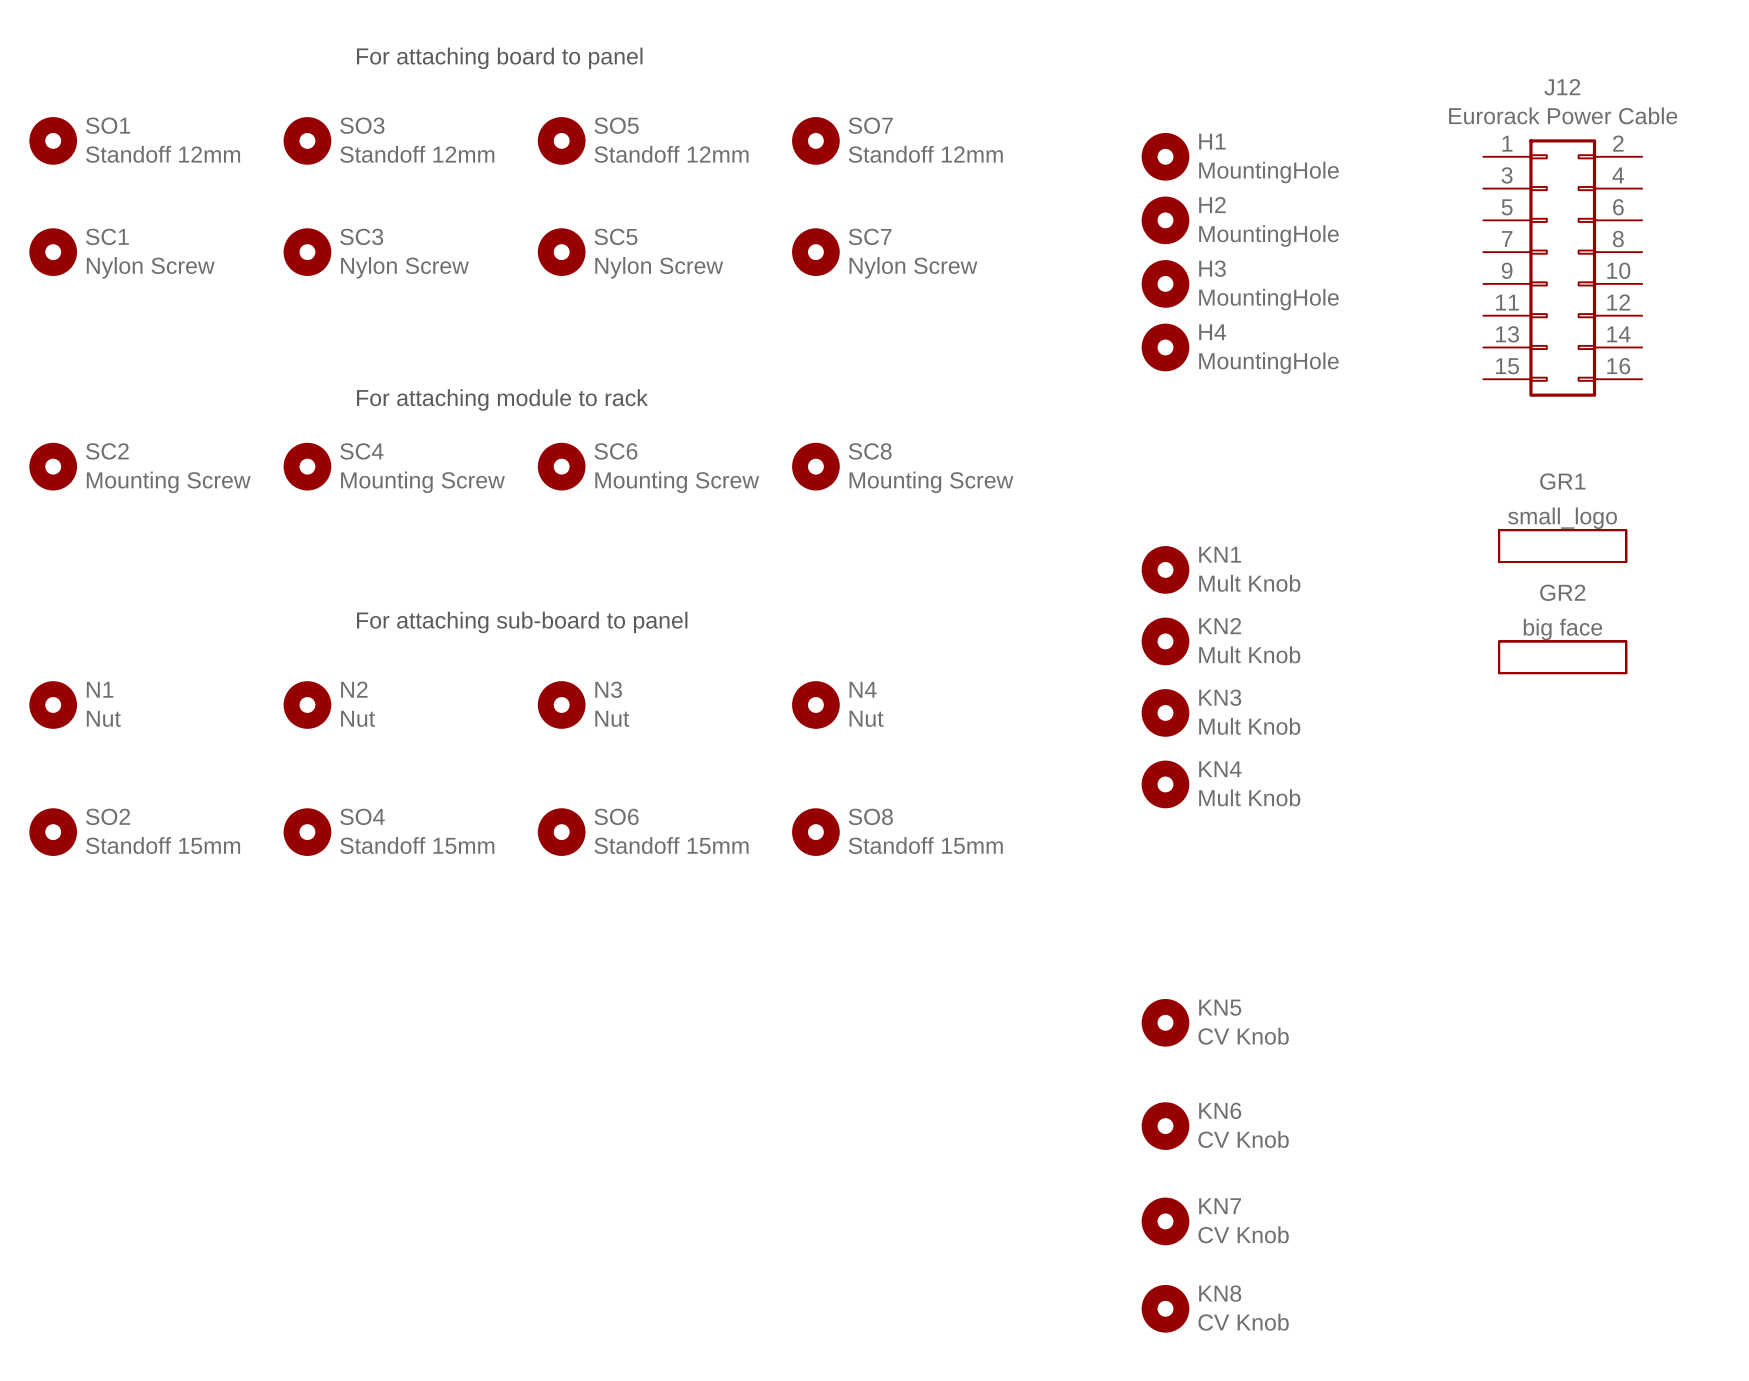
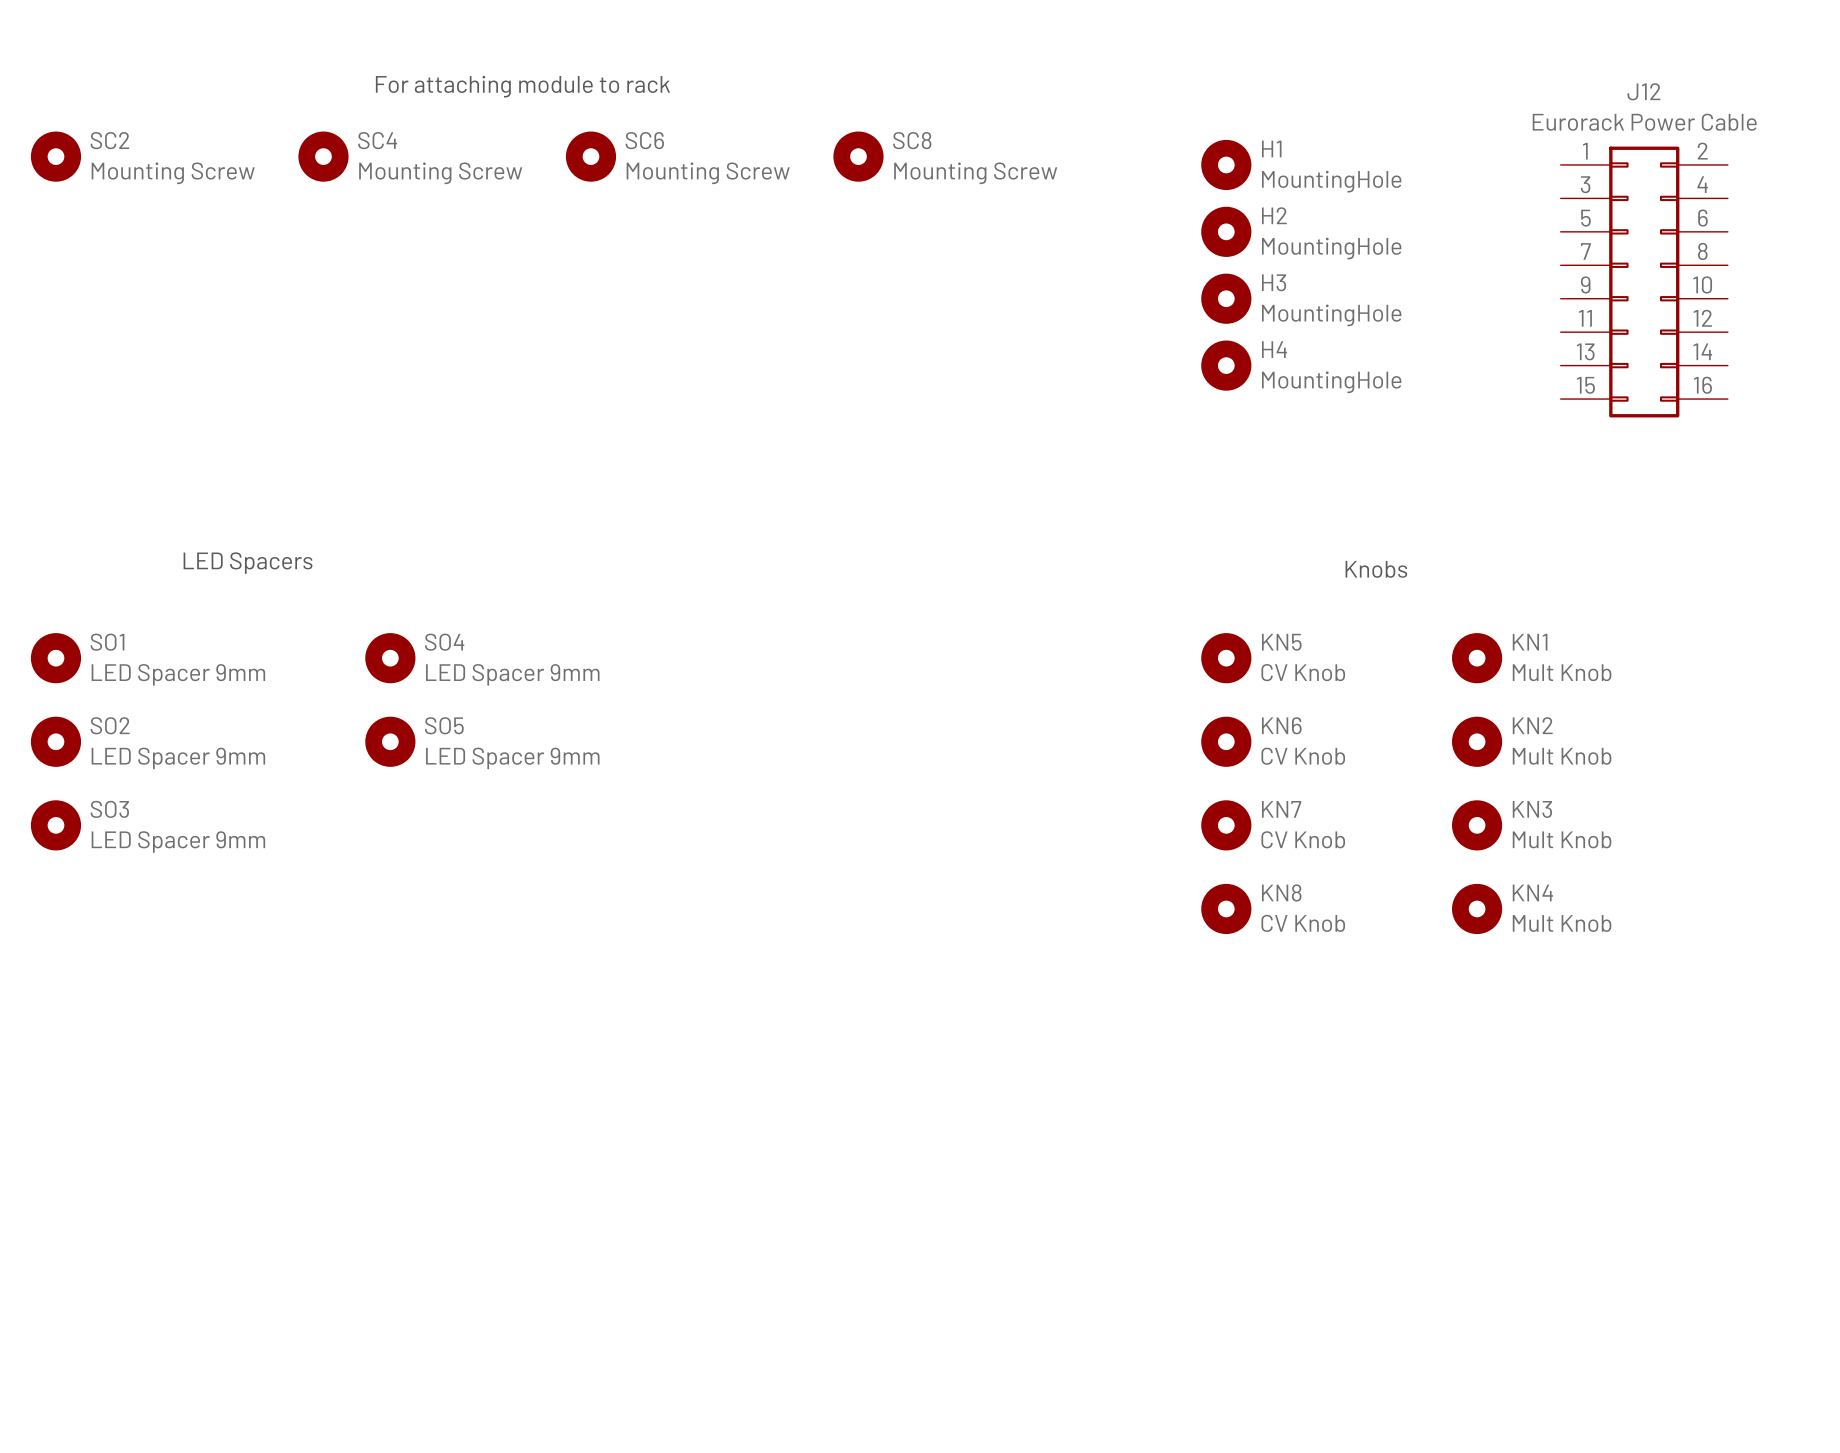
text: For attaching board to panel (499, 58) -> For attaching module to rack (522, 86)
SO1 position: (53, 140) -> (55, 658)
SO3 position: (307, 140) -> (55, 825)
SO5 position: (561, 140) -> (390, 741)
SO7: Standoff 12mm (815, 140) -> none
SO1 value: Standoff 12mm (163, 154) -> LED Spacer 9mm (178, 674)
SO3 value: Standoff 12mm (417, 154) -> LED Spacer 9mm (178, 842)
SO5 value: Standoff 12mm (671, 154) -> LED Spacer 9mm (512, 758)
SC1: Nylon Screw (53, 252) -> none
SC3: Nylon Screw (307, 252) -> none
SC5: Nylon Screw (561, 252) -> none
SC7: Nylon Screw (815, 252) -> none
text: For attaching module to rack (502, 399) -> none
SC2 position: (53, 466) -> (55, 156)
SC4 position: (307, 466) -> (323, 156)
SC6 position: (561, 466) -> (590, 156)
SC8 position: (815, 466) -> (858, 156)
text: none -> LED Spacers (248, 563)
text: none -> Knobs (1376, 569)
GR1: small_logo (1562, 546) -> none
KN1 position: (1165, 569) -> (1477, 658)
text: For attaching sub-board to panel (522, 622) -> none
KN2 position: (1165, 641) -> (1477, 741)
GR2: big face (1562, 657) -> none
N1 name: N1 (100, 689) -> SO2 (110, 725)
N2: Nut (307, 704) -> none
N3: Nut (561, 704) -> none
N4: Nut (815, 704) -> none
KN3 position: (1165, 712) -> (1477, 825)
N1 value: Nut (103, 718) -> LED Spacer 9mm (178, 758)
KN4 name: KN4 (1220, 769) -> KN7 (1281, 809)
KN4 value: Mult Knob (1249, 797) -> CV Knob (1303, 839)
SO2: Standoff 15mm (53, 832) -> none
SO4 position: (307, 832) -> (390, 658)
SO6: Standoff 15mm (561, 832) -> none
SO8: Standoff 15mm (815, 832) -> none
SO4 value: Standoff 15mm (417, 845) -> LED Spacer 9mm (512, 674)
KN4: none -> Mult Knob (1477, 908)
KN5 position: (1165, 1022) -> (1226, 658)
KN6 position: (1165, 1126) -> (1226, 741)
KN7: CV Knob (1165, 1221) -> none
KN8 position: (1165, 1308) -> (1226, 908)

